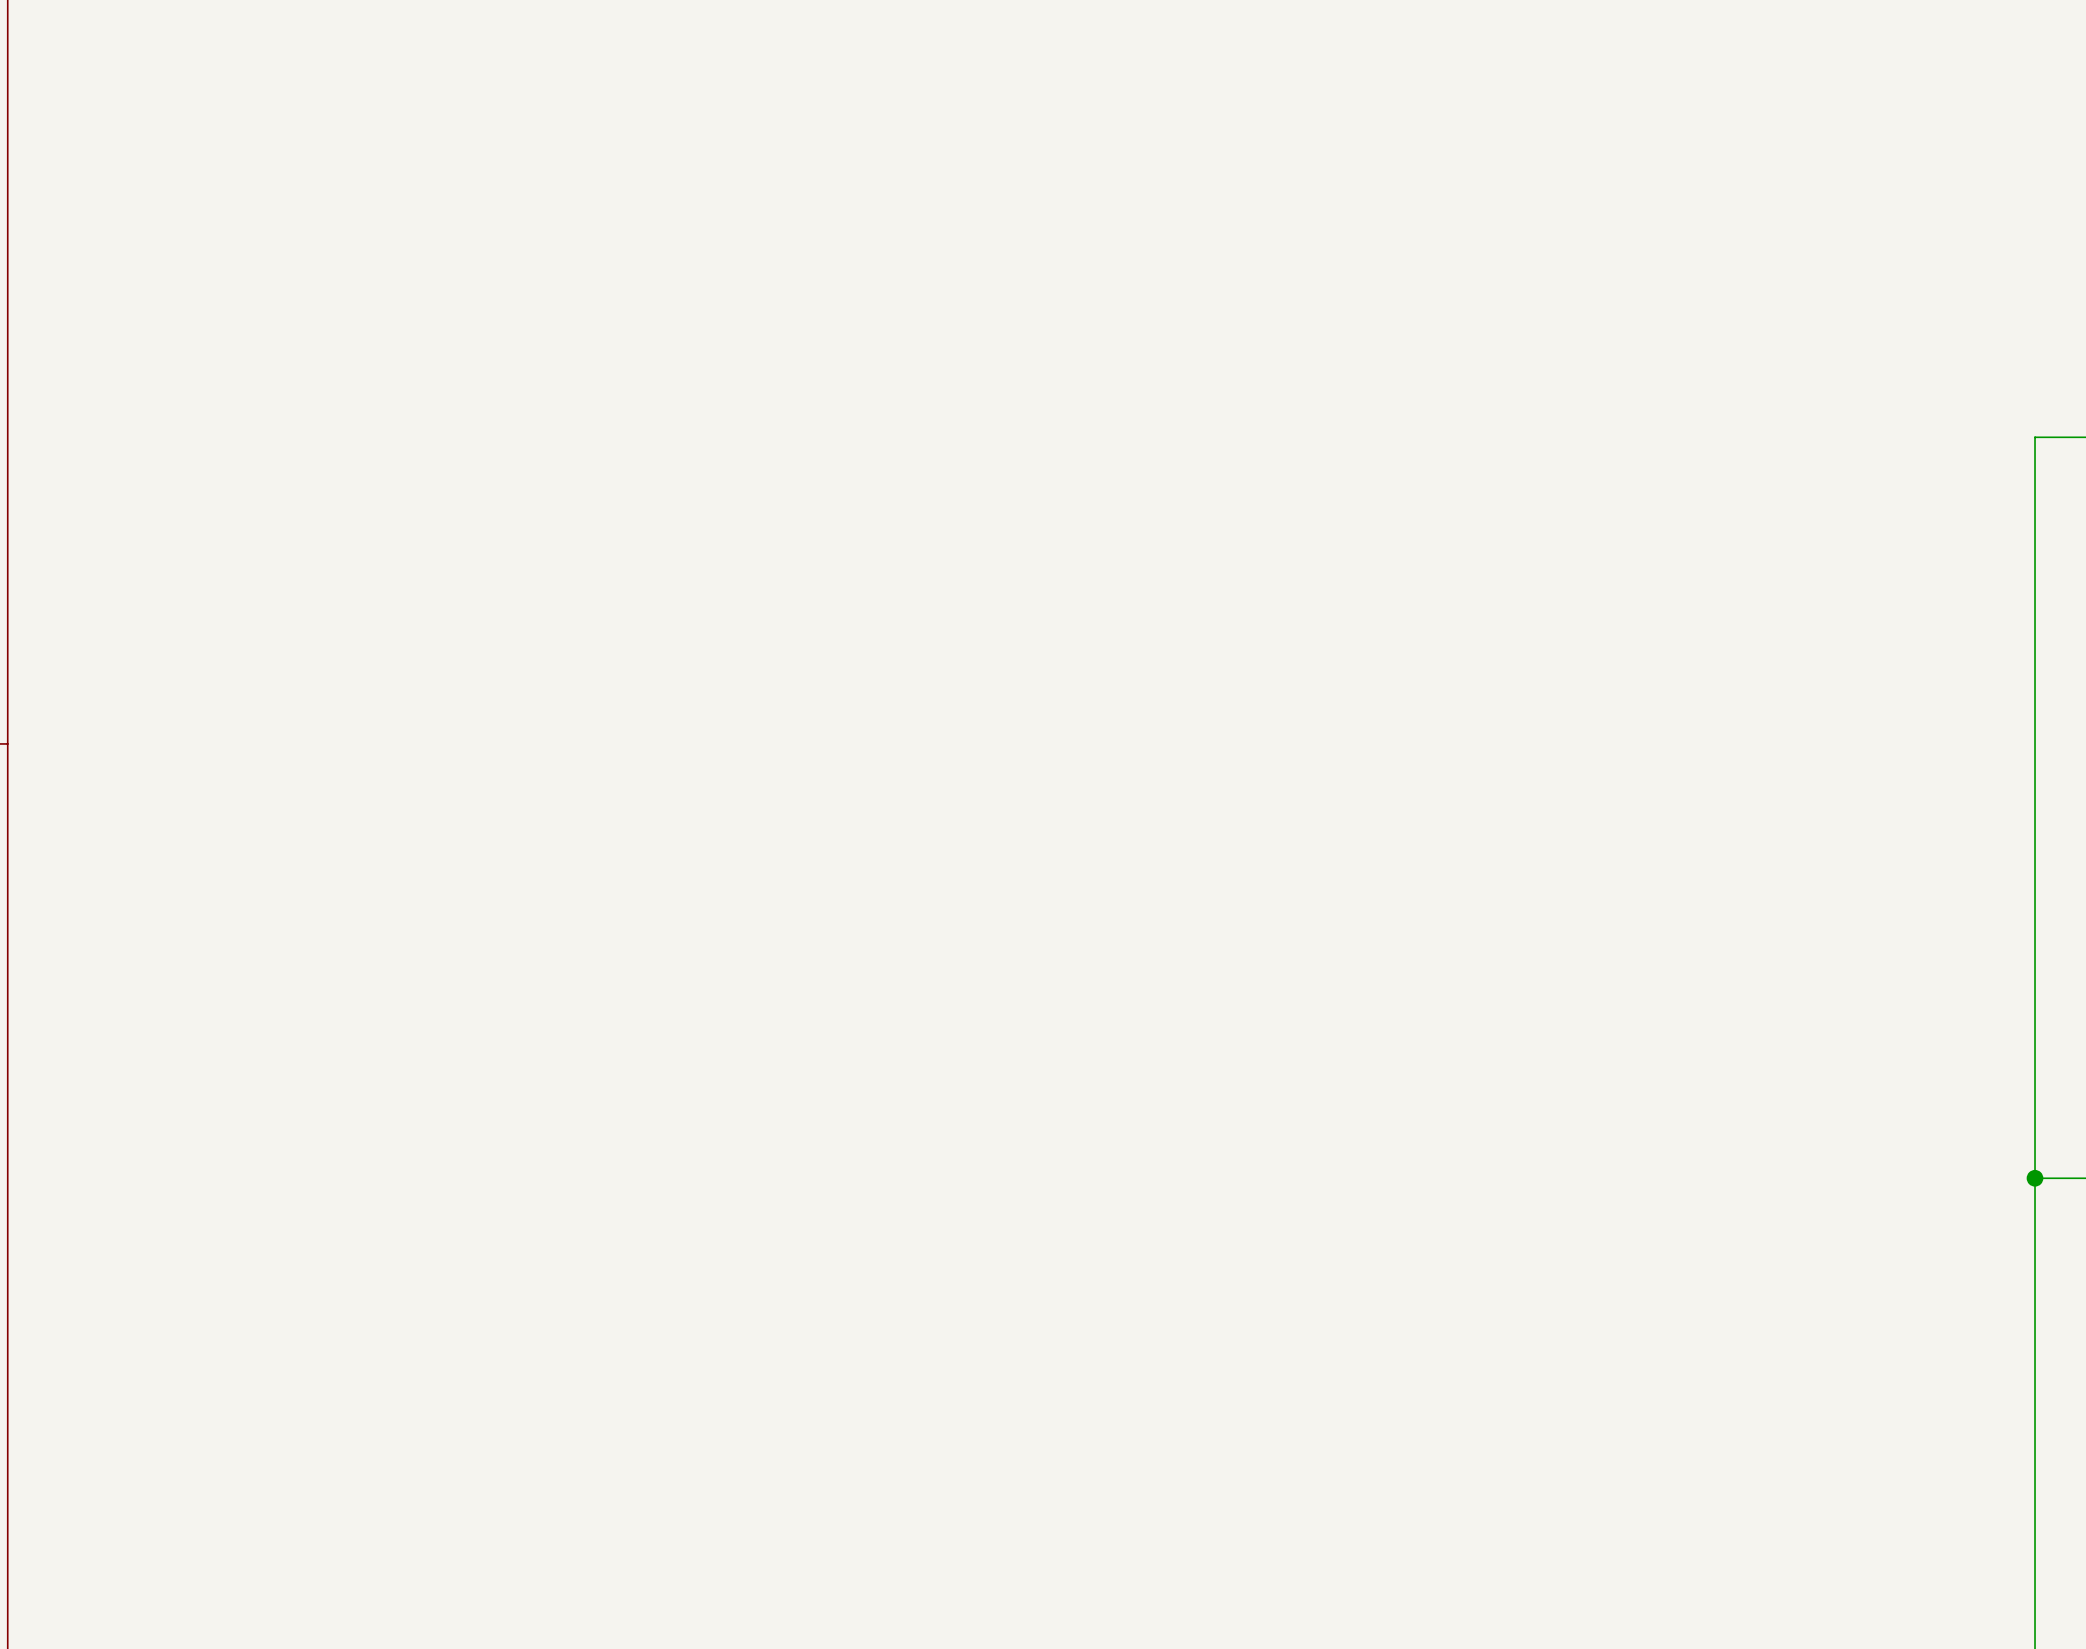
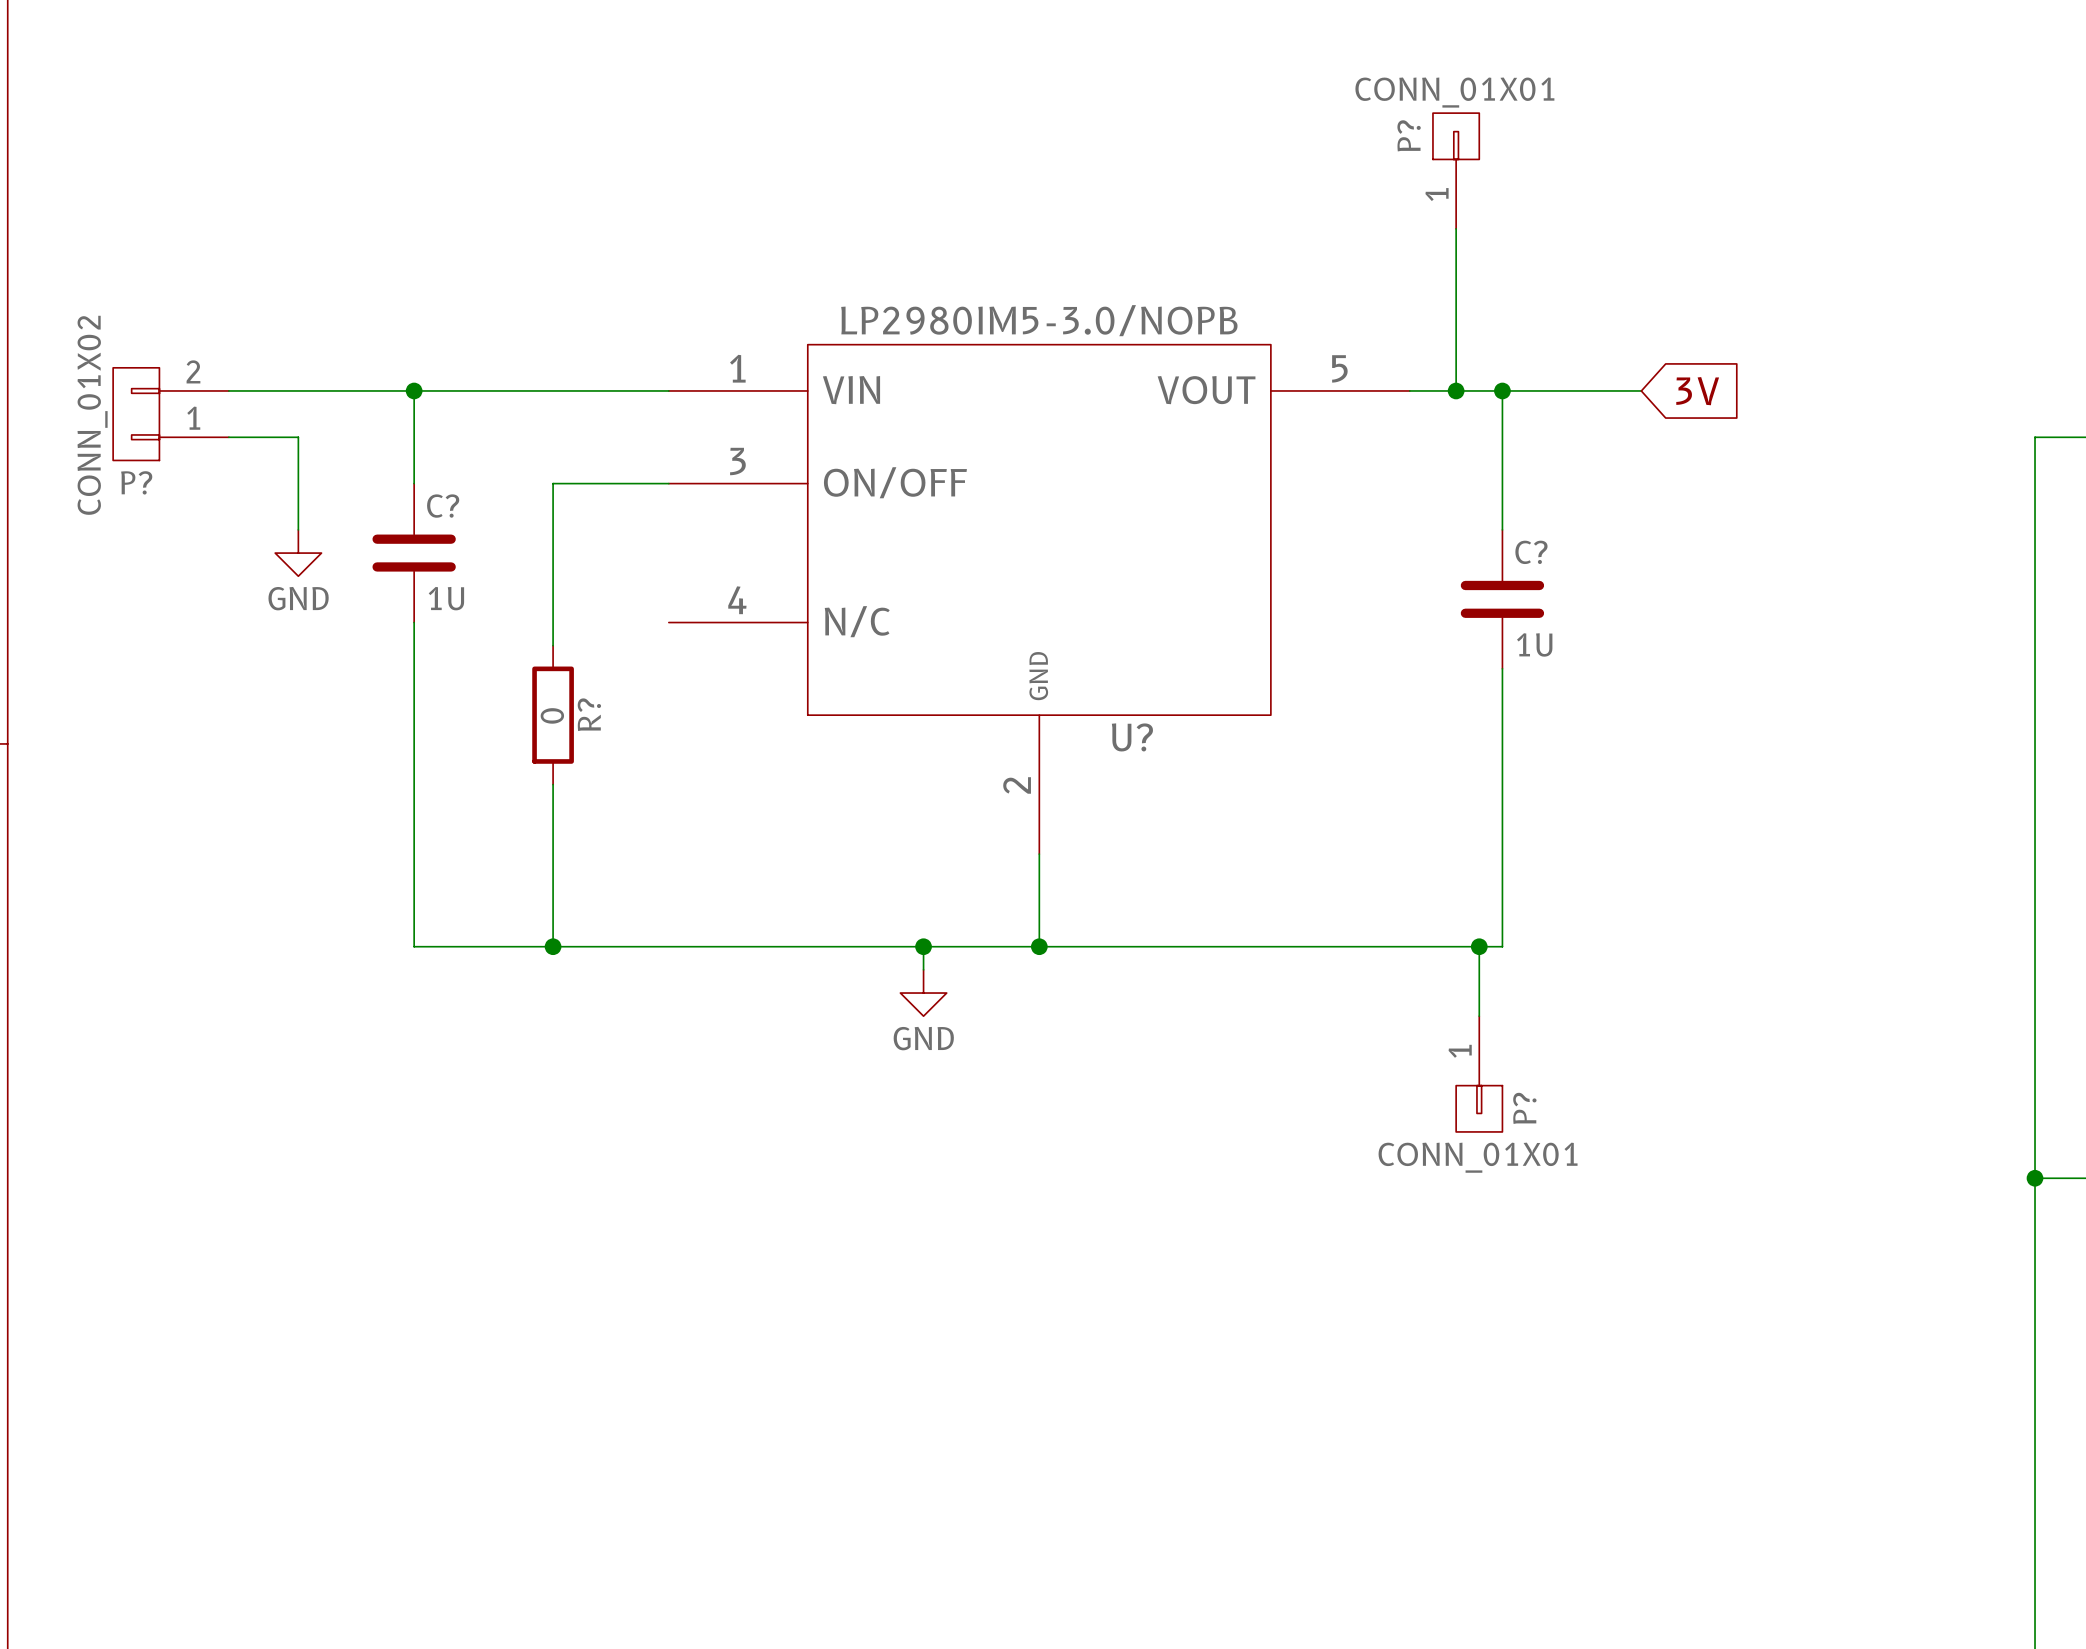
P?: none -> CONN_01X01 (1456, 171)
wire: none -> (1456, 228) (1456, 390)
wire: none -> (228, 390) (668, 390)
wire: none -> (414, 390) (414, 483)
junction: none -> (414, 390)
wire: none -> (1409, 390) (1641, 390)
junction: none -> (1456, 390)
wire: none -> (1502, 390) (1502, 529)
junction: none -> (1502, 390)
global label: none -> 3V (1697, 391)
P?: none -> CONN_01X02 (171, 414)
wire: none -> (228, 437) (298, 437) (298, 529)
wire: none -> (668, 483) (553, 483) (553, 645)
power symbol: none -> GND (298, 553)
C?: none -> 1U (414, 553)
U?: none -> LP2980IM5-3.0/NOPB (1039, 599)
C?: none -> 1U (1502, 599)
wire: none -> (414, 622) (414, 946) (1502, 946) (1502, 668)
R?: none -> 0 (553, 715)
wire: none -> (553, 784) (553, 946)
wire: none -> (1039, 854) (1039, 946)
junction: none -> (553, 946)
wire: none -> (923, 946) (923, 969)
junction: none -> (923, 946)
junction: none -> (1039, 946)
wire: none -> (1479, 946) (1479, 1016)
junction: none -> (1479, 946)
power symbol: none -> GND (923, 993)
P?: none -> CONN_01X01 (1479, 1074)

